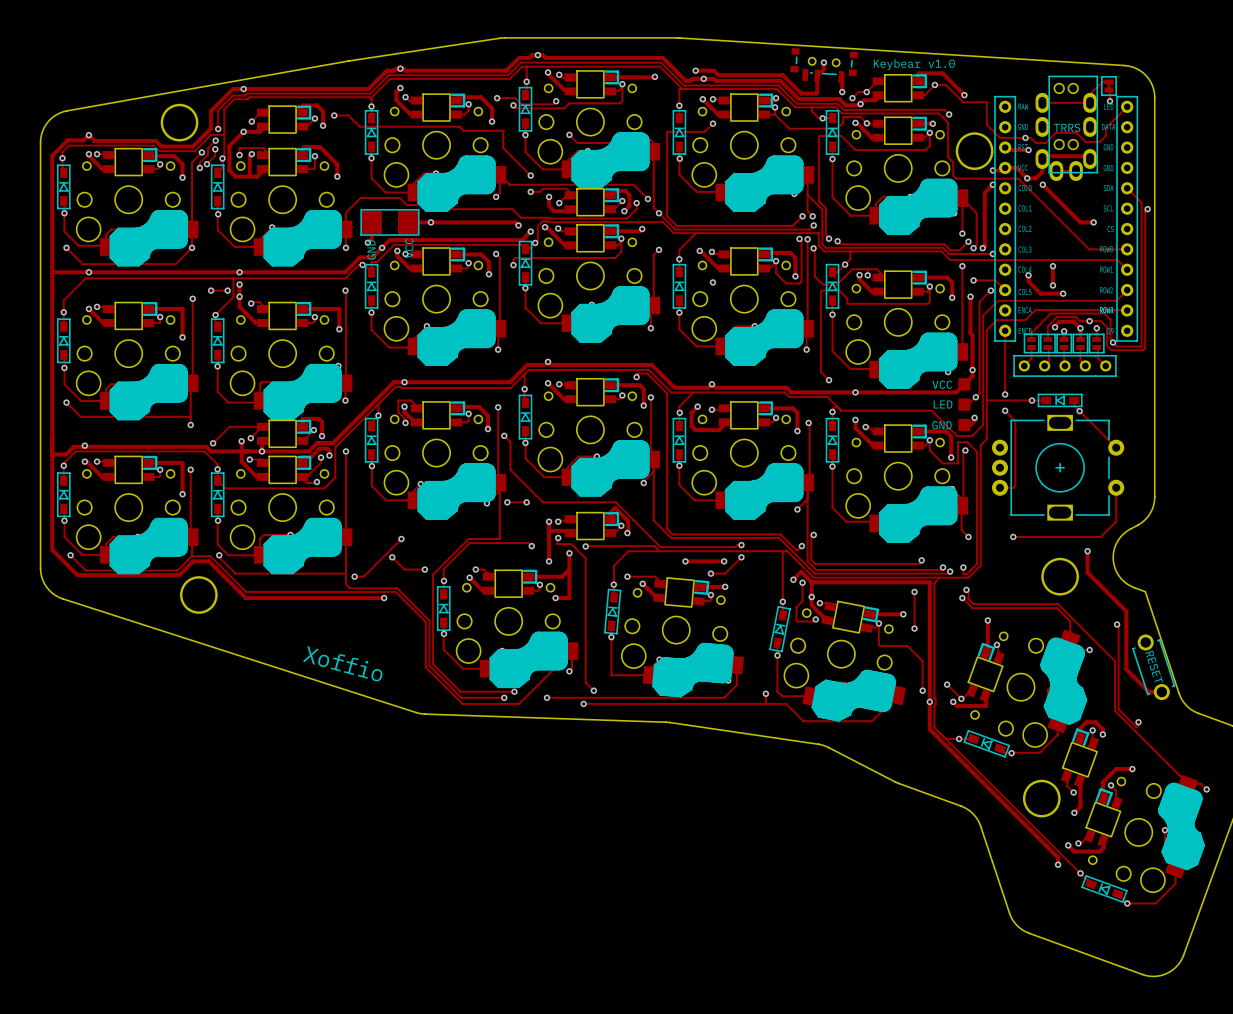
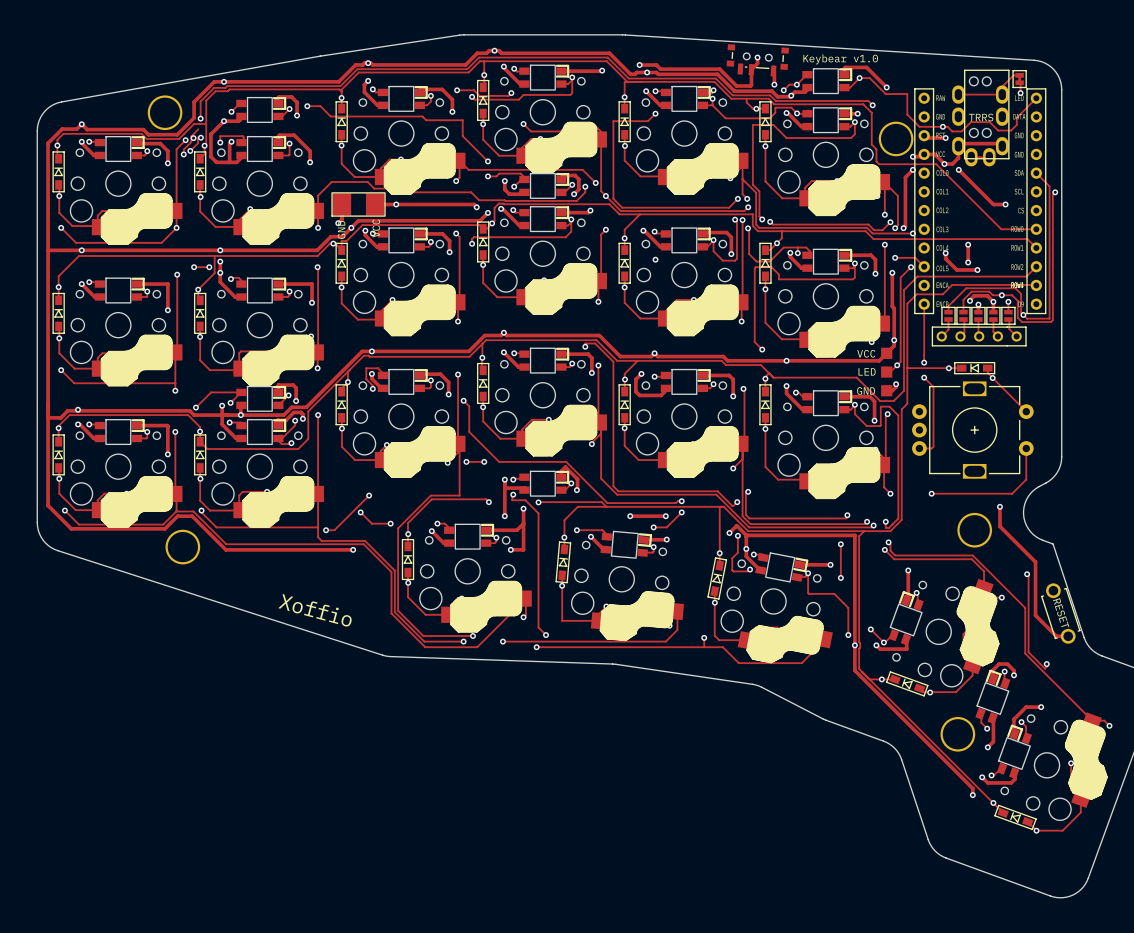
via: (215, 140) -> none
via: (215, 149) -> none
via: none -> (200, 137)
via: none -> (193, 138)

